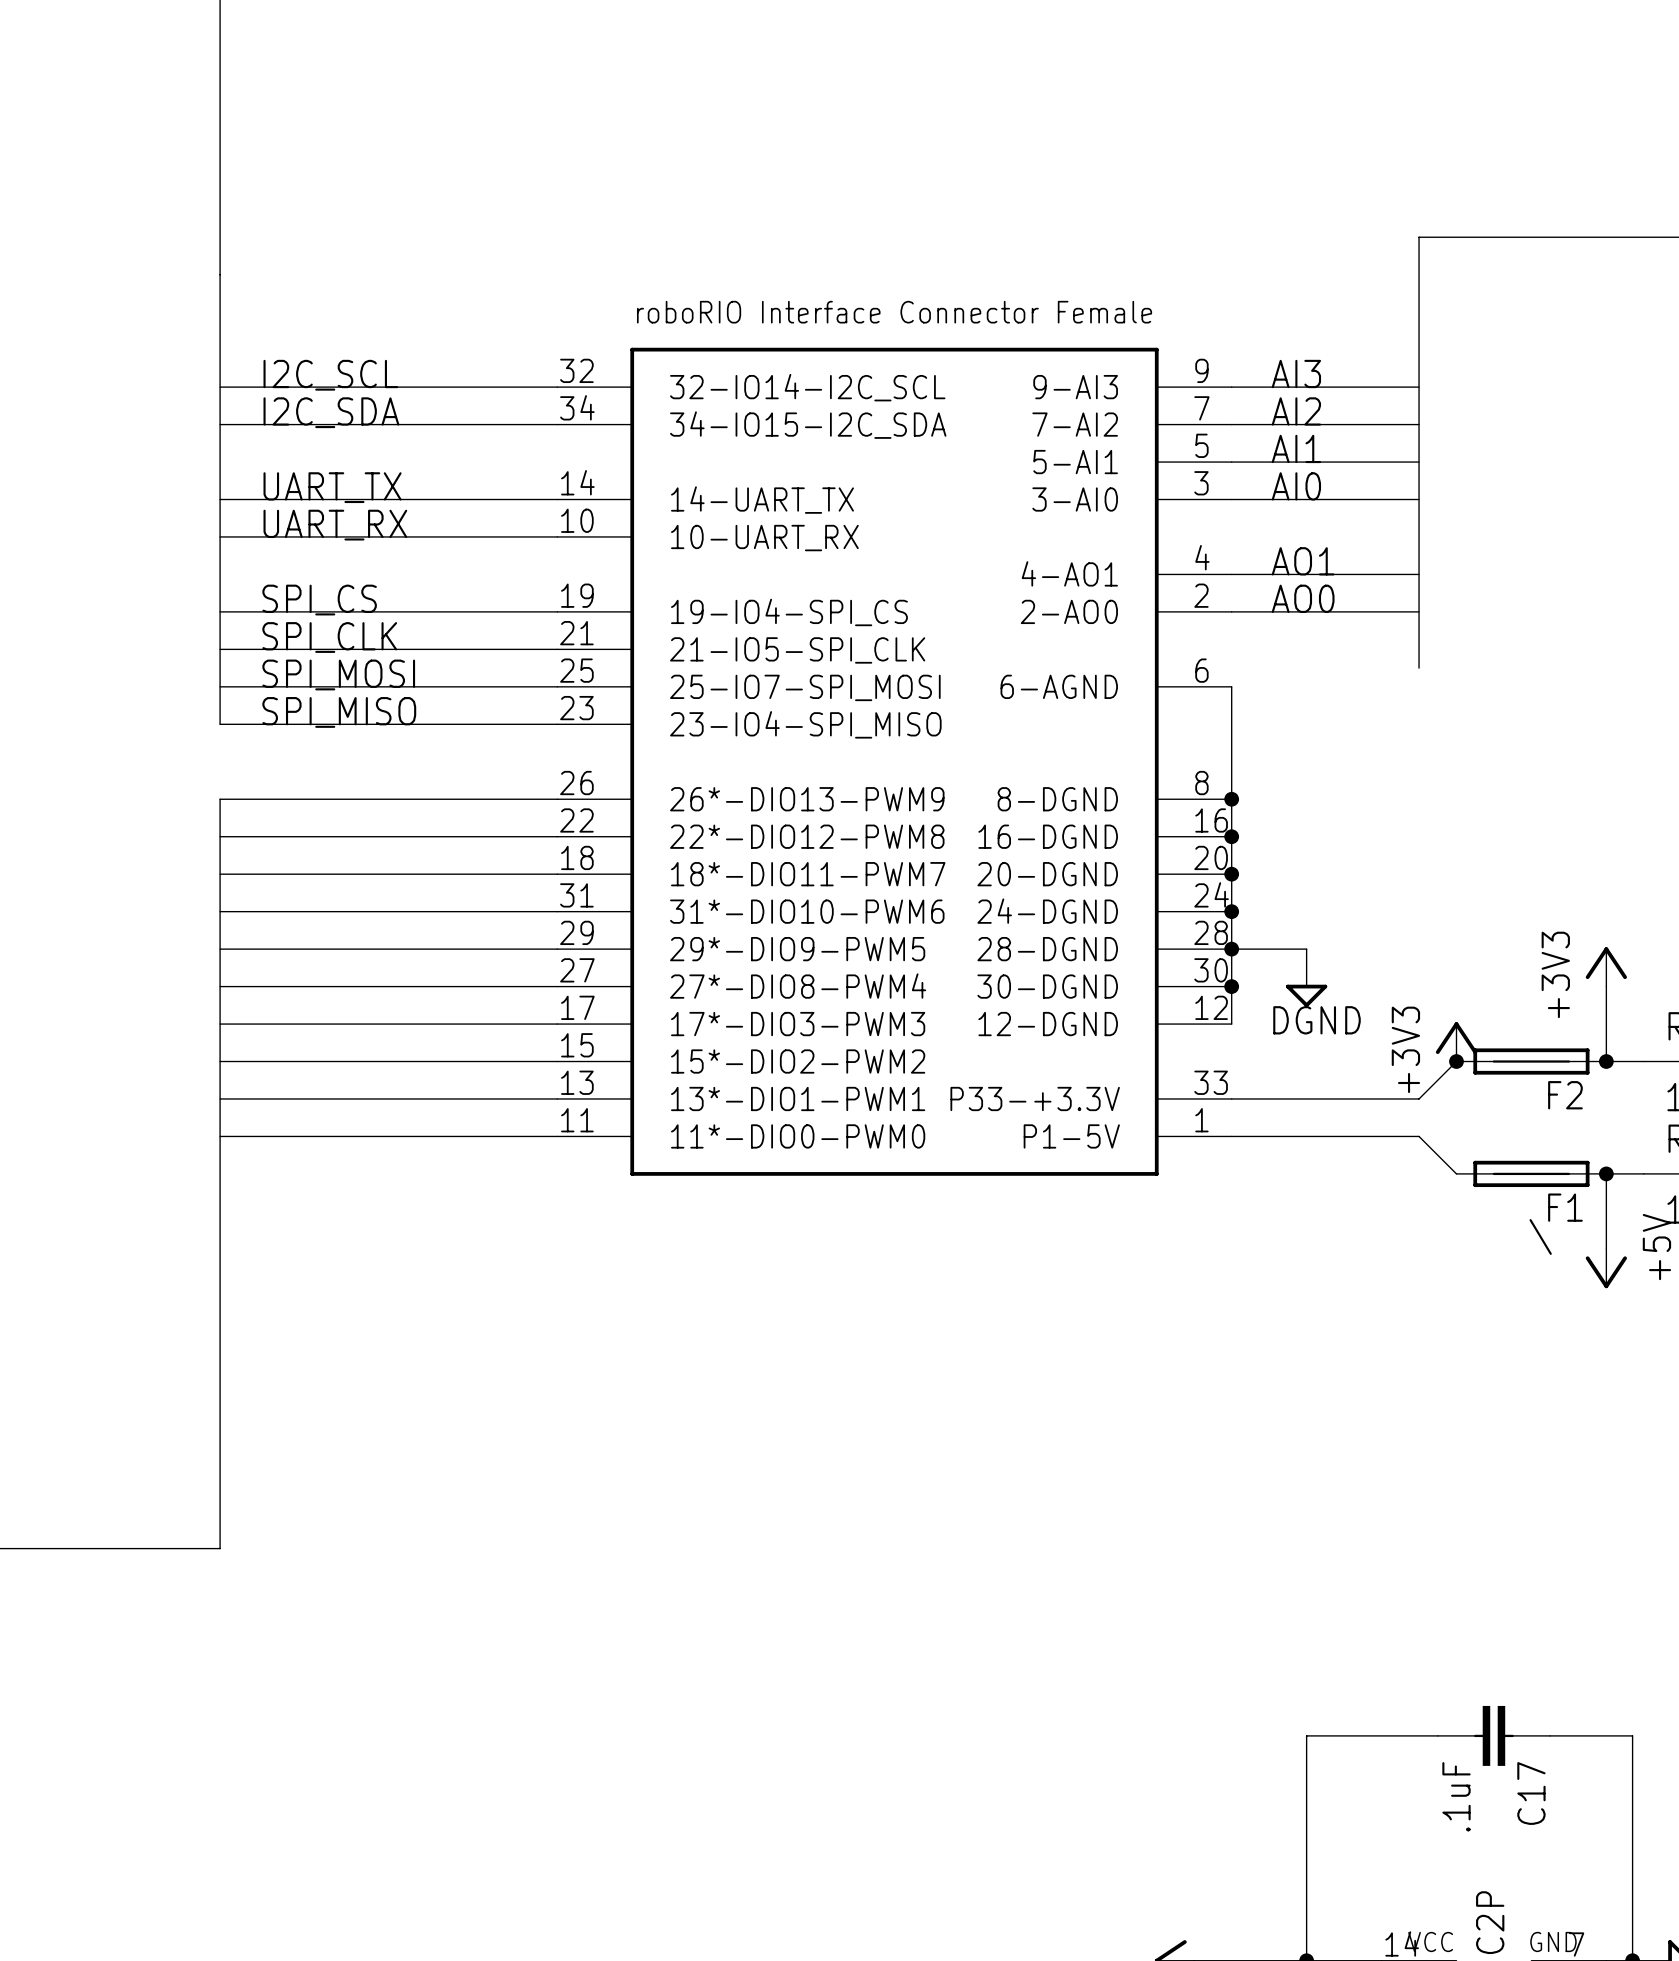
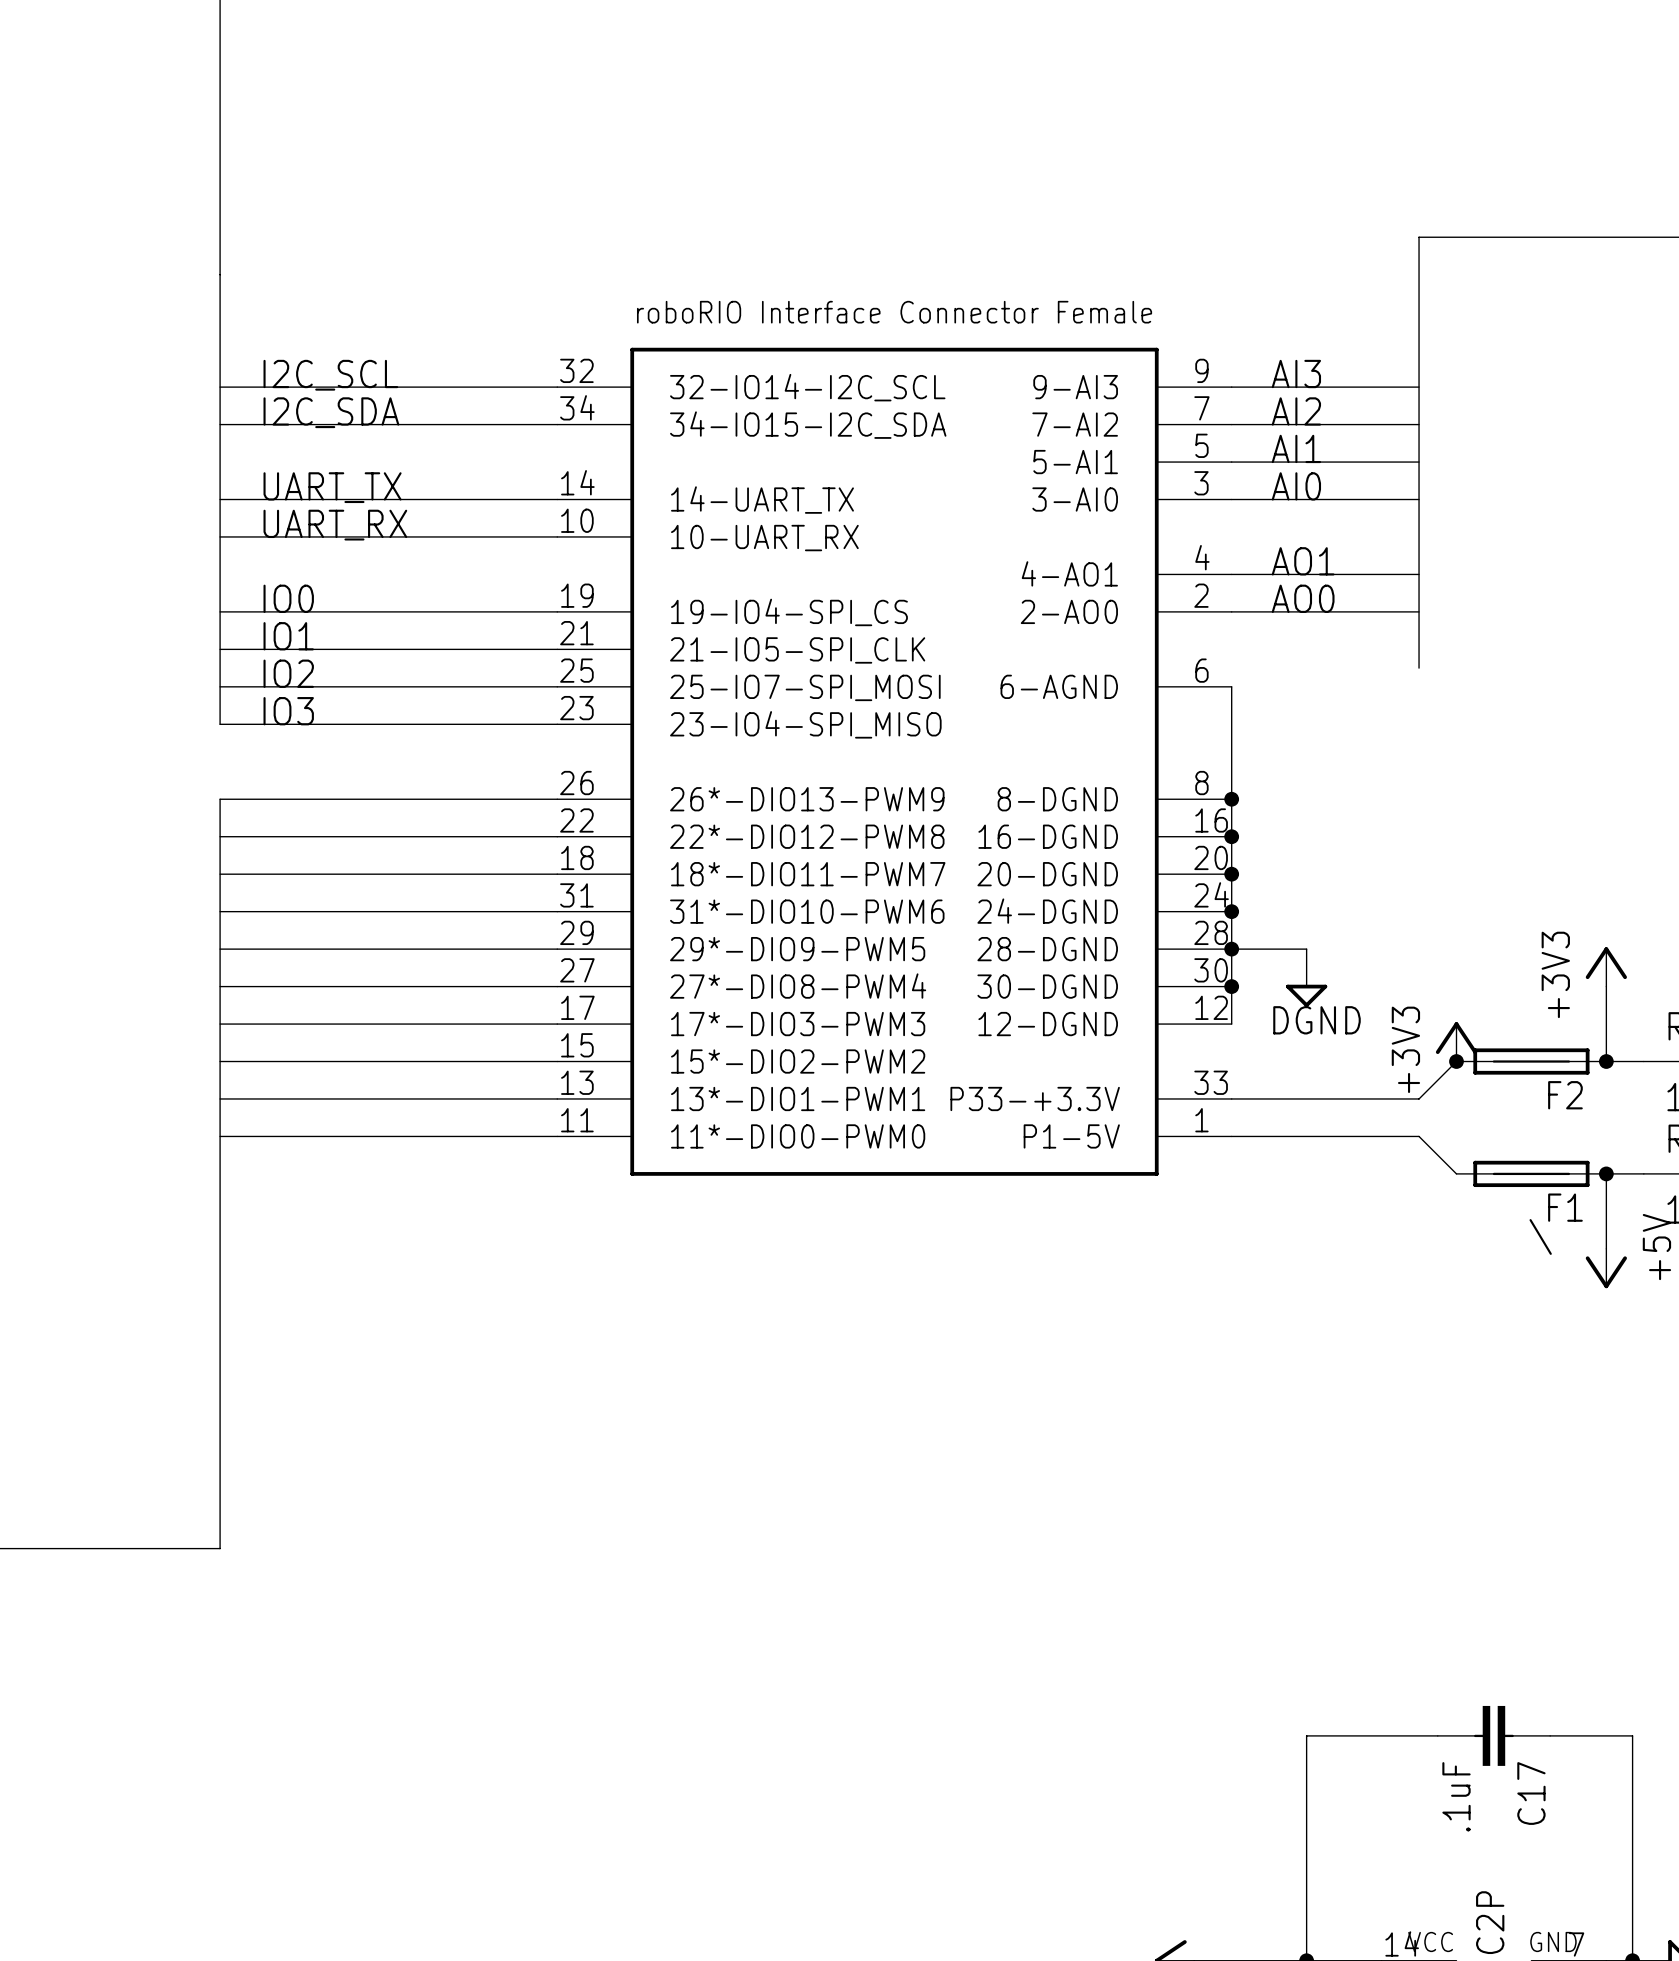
label: SPI_CS (319, 600) -> IO0 (288, 598)
label: SPI_CLK (329, 637) -> IO1 (288, 636)
label: SPI_MOSI (338, 674) -> IO2 (288, 673)
label: SPI_MISO (339, 712) -> IO3 (288, 711)

